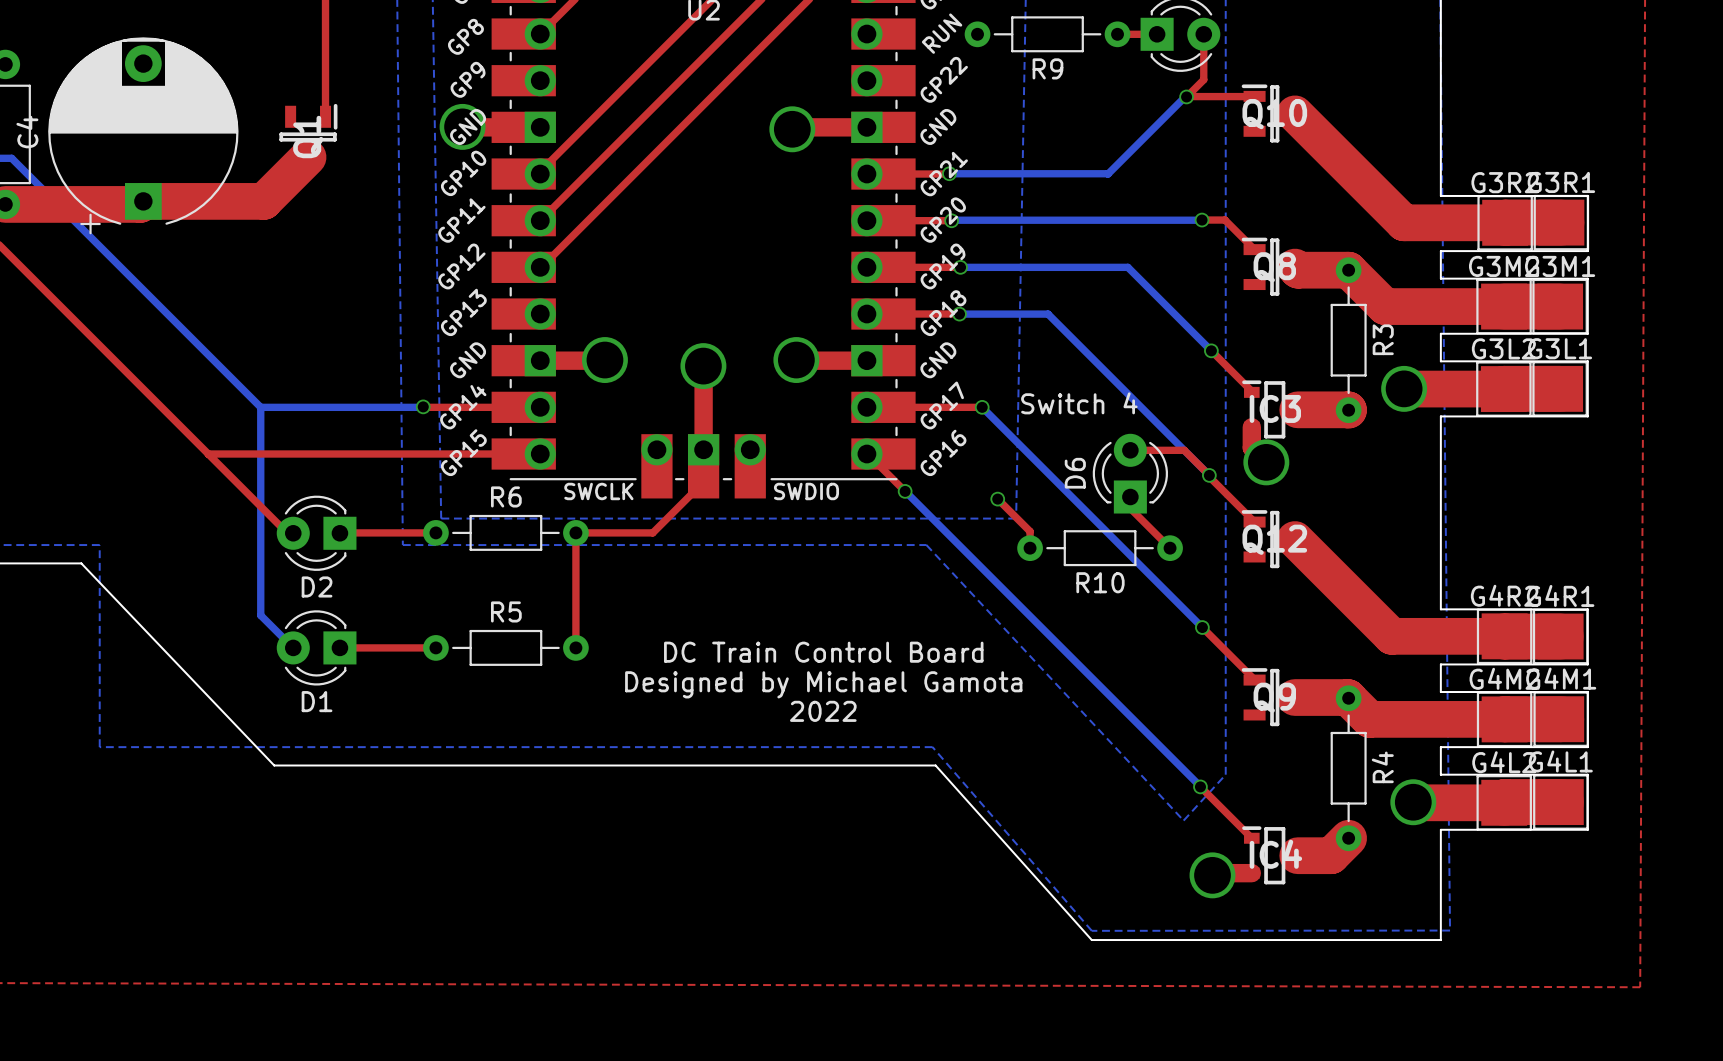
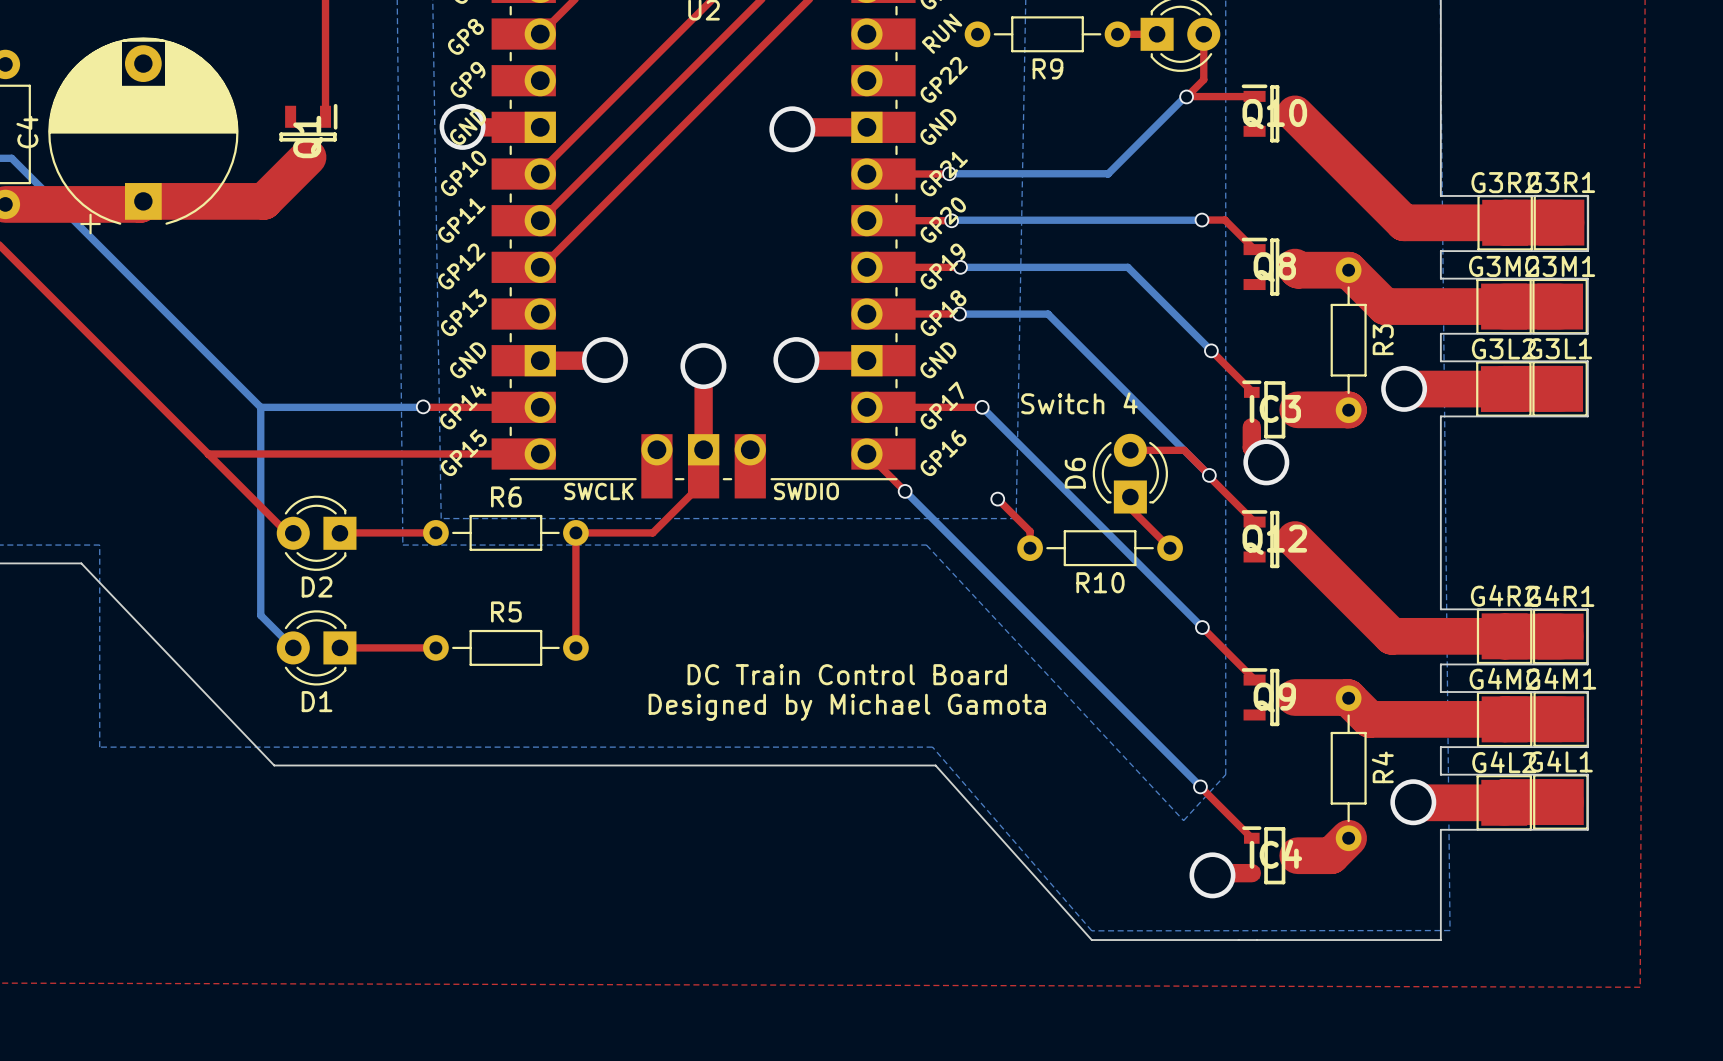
text position: DC Train Control Board (823, 652) -> DC Train Control Board (847, 674)
text position: Designed by Michael Gamota (823, 684) -> Designed by Michael Gamota (847, 707)
text: 2022 (823, 711) -> none

